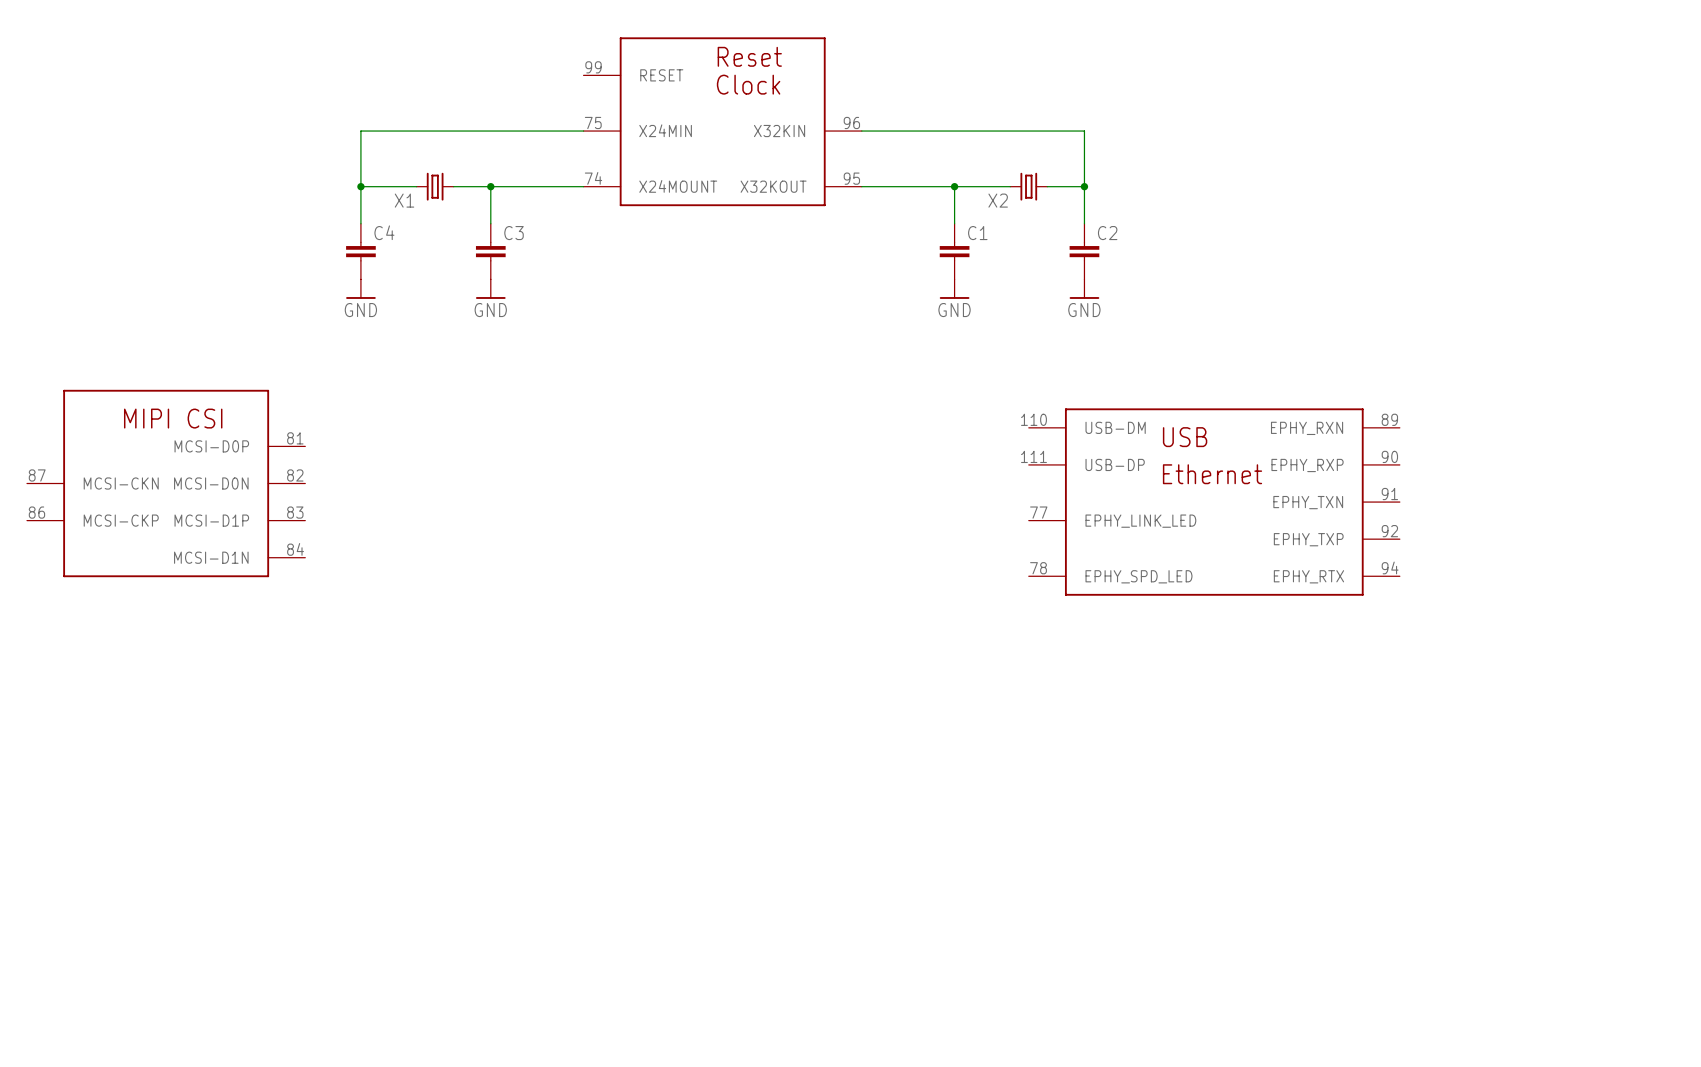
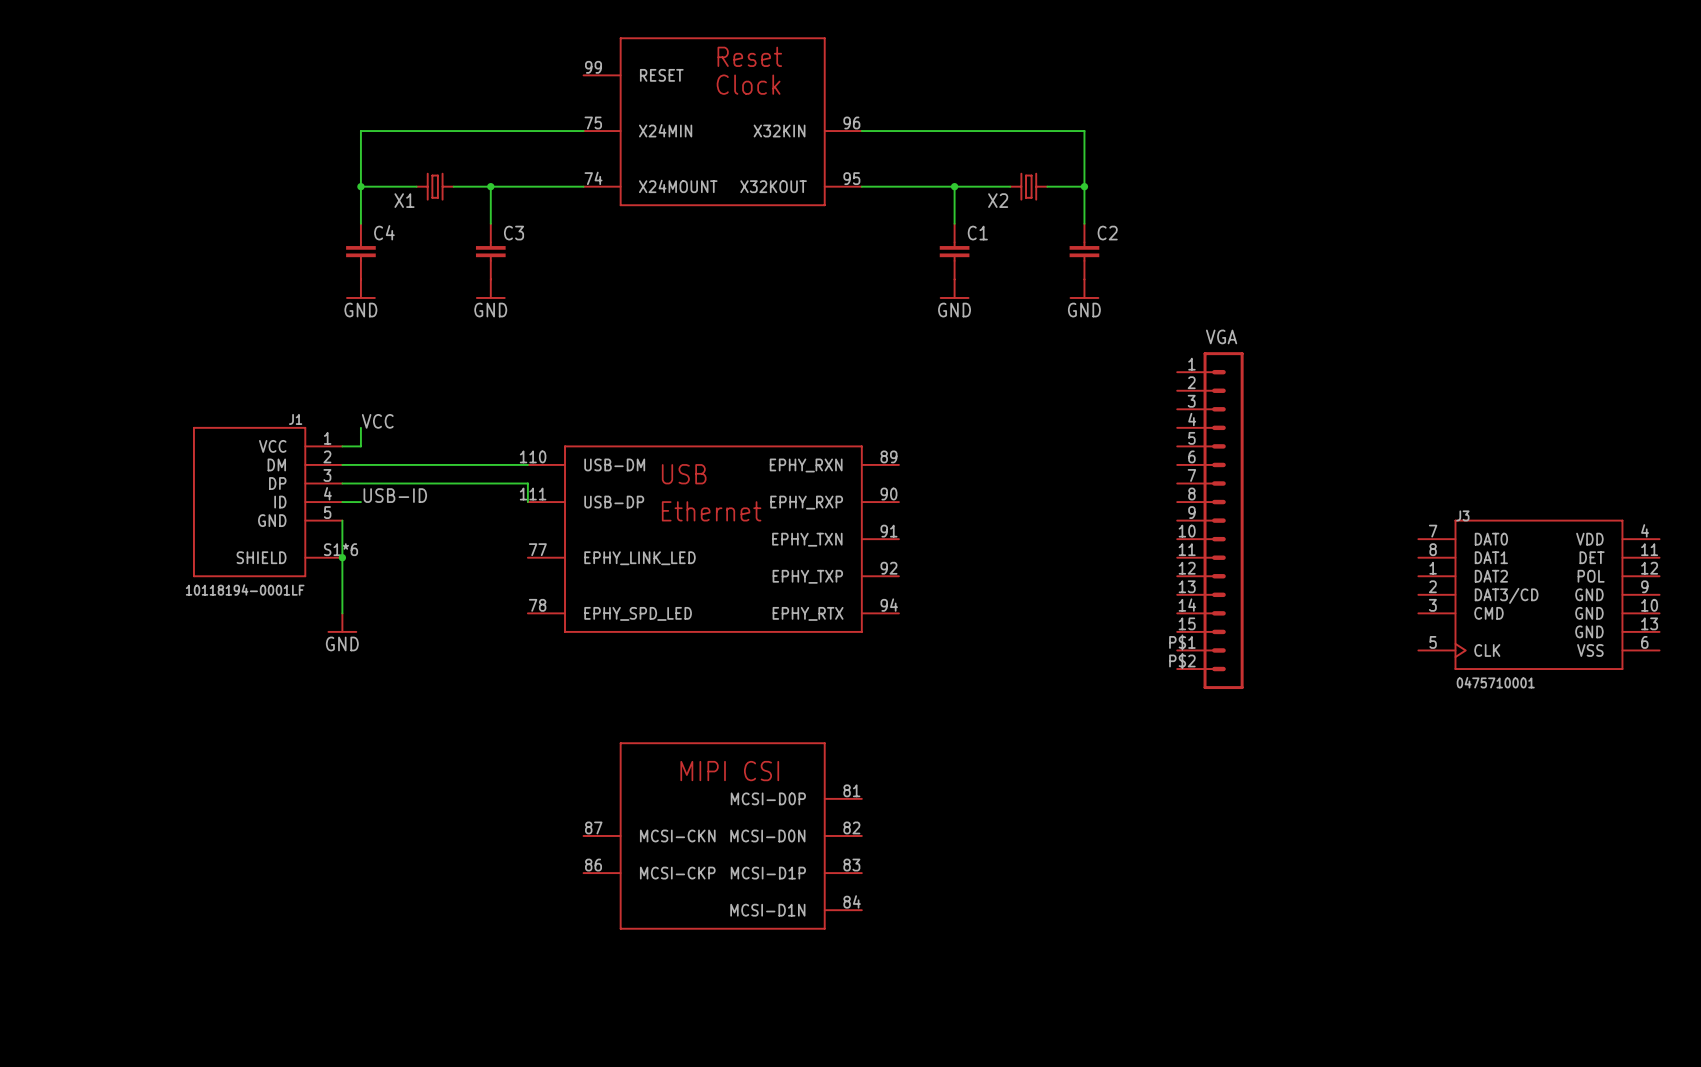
label: none -> VCC (377, 421)
wire: none -> (360, 427) (360, 446) (342, 446)
wire: none -> (342, 464) (527, 464)
part: (166, 483) -> none
wire: none -> (342, 483) (527, 483) (527, 502)
label: none -> USB-ID (395, 495)
J1: none -> 10118194-0001LF (267, 502)
wire: none -> (342, 502) (360, 502)
part: (1214, 502) -> none
wire: none -> (342, 520) (342, 613)
part: none -> (1210, 520)
part: none -> (713, 539)
junction: none -> (342, 557)
J3: none -> 0475710001 (1538, 594)
power symbol: none -> GND (342, 623)
part: none -> (722, 835)

